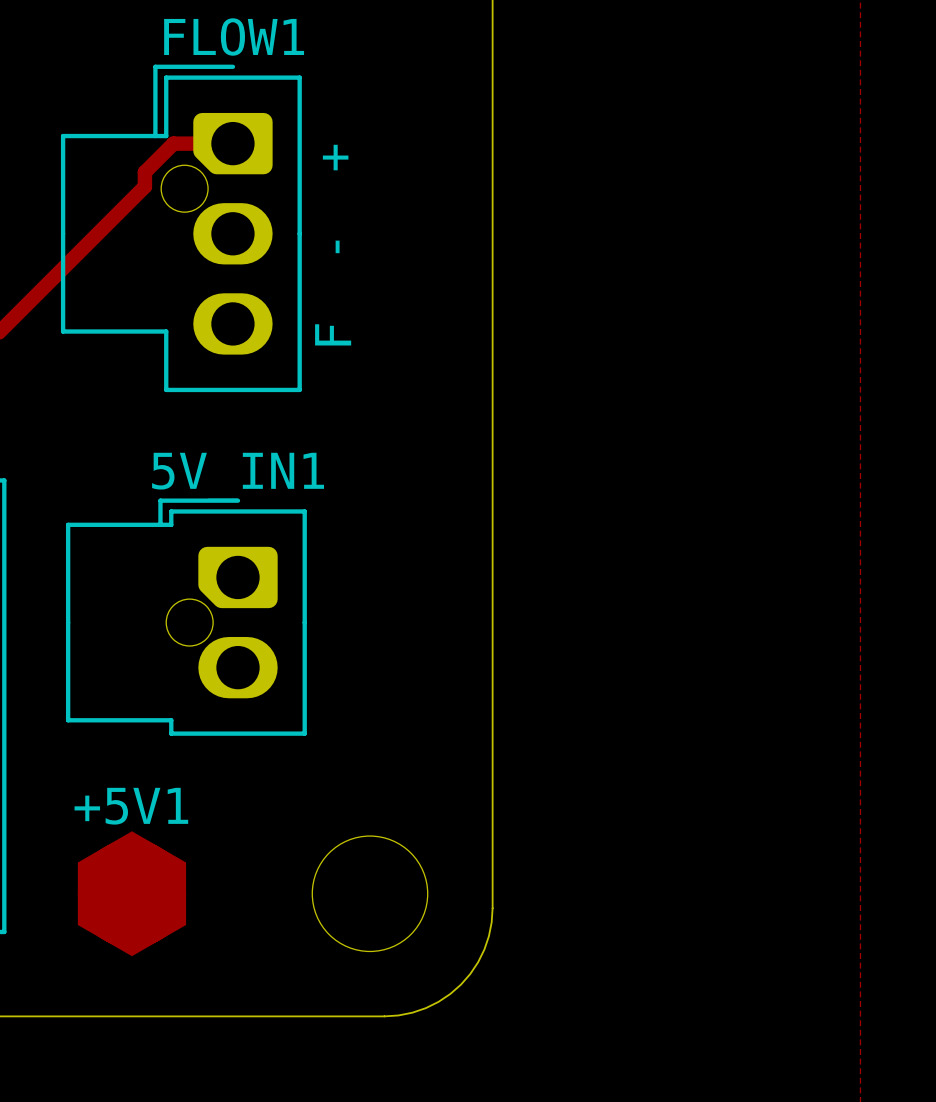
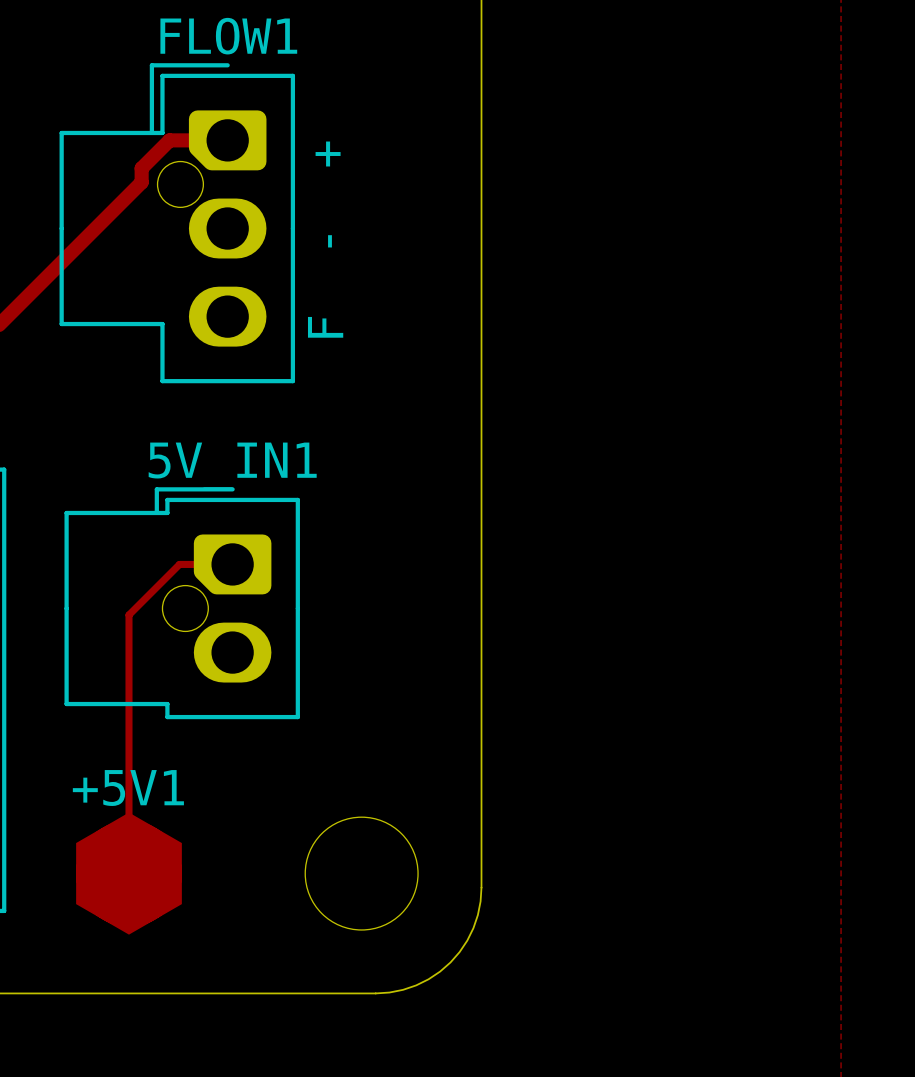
track: none -> (232, 564) (179, 564) (128, 615) (128, 873)

